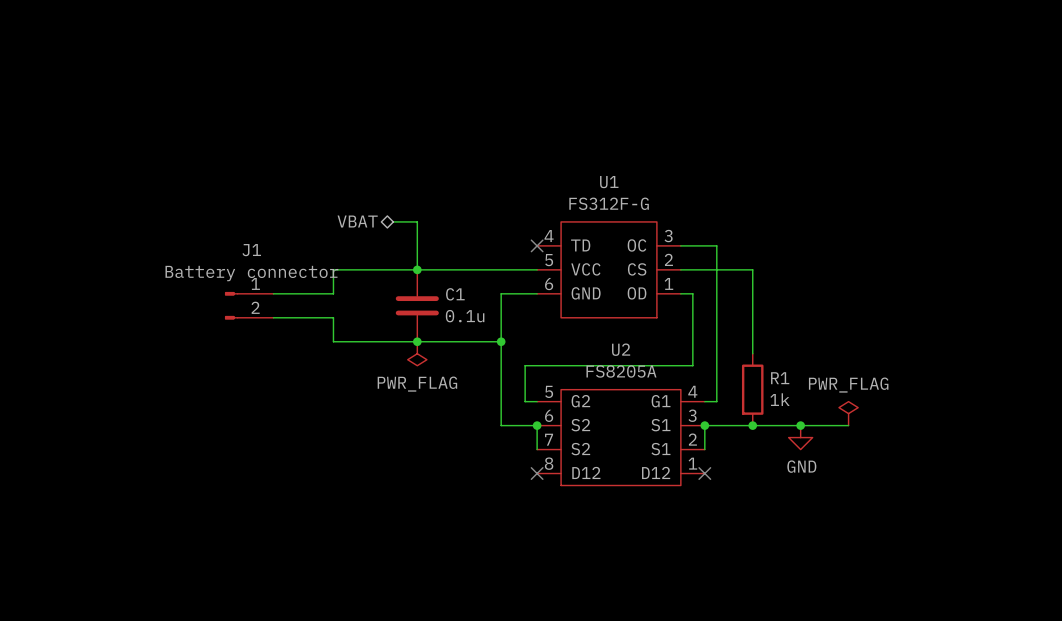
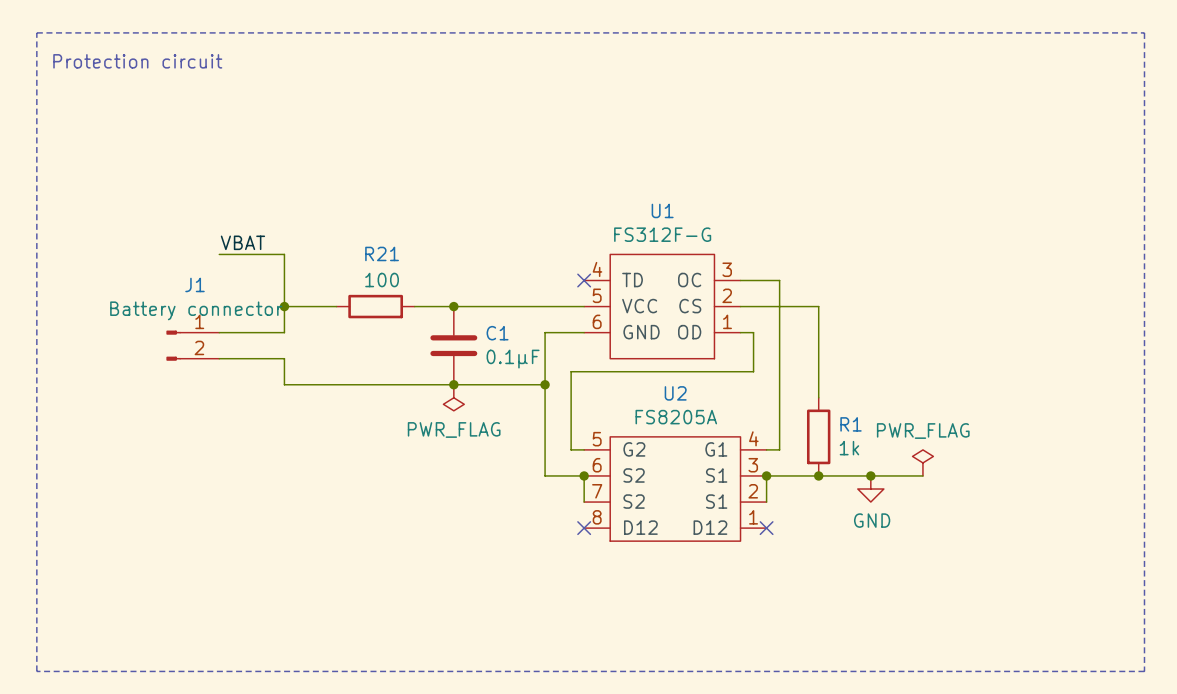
line: none -> (36, 32) (36, 671) (1144, 671) (1144, 32) (36, 32)
text: none -> Protection circuit (137, 61)
label: none -> VBAT (242, 242)
wire: none -> (219, 254) (284, 254) (284, 332) (219, 332)
hierarchical label: VBAT (357, 221) -> none
wire: (393, 221) (417, 221) (417, 269) -> none
junction: none -> (284, 306)
R21: none -> 100 (375, 306)
wire: (381, 269) (333, 269) (333, 293) (273, 293) -> none
J1 position: (249, 305) -> (192, 345)
C1 value: 0.1u (465, 316) -> 0.1µF (513, 359)
wire: (273, 317) (333, 317) (333, 341) -> (219, 358) (284, 358) (284, 384) (362, 384)
wire: (692, 329) (692, 365) (525, 365) -> (753, 371) (571, 371) (571, 410)

